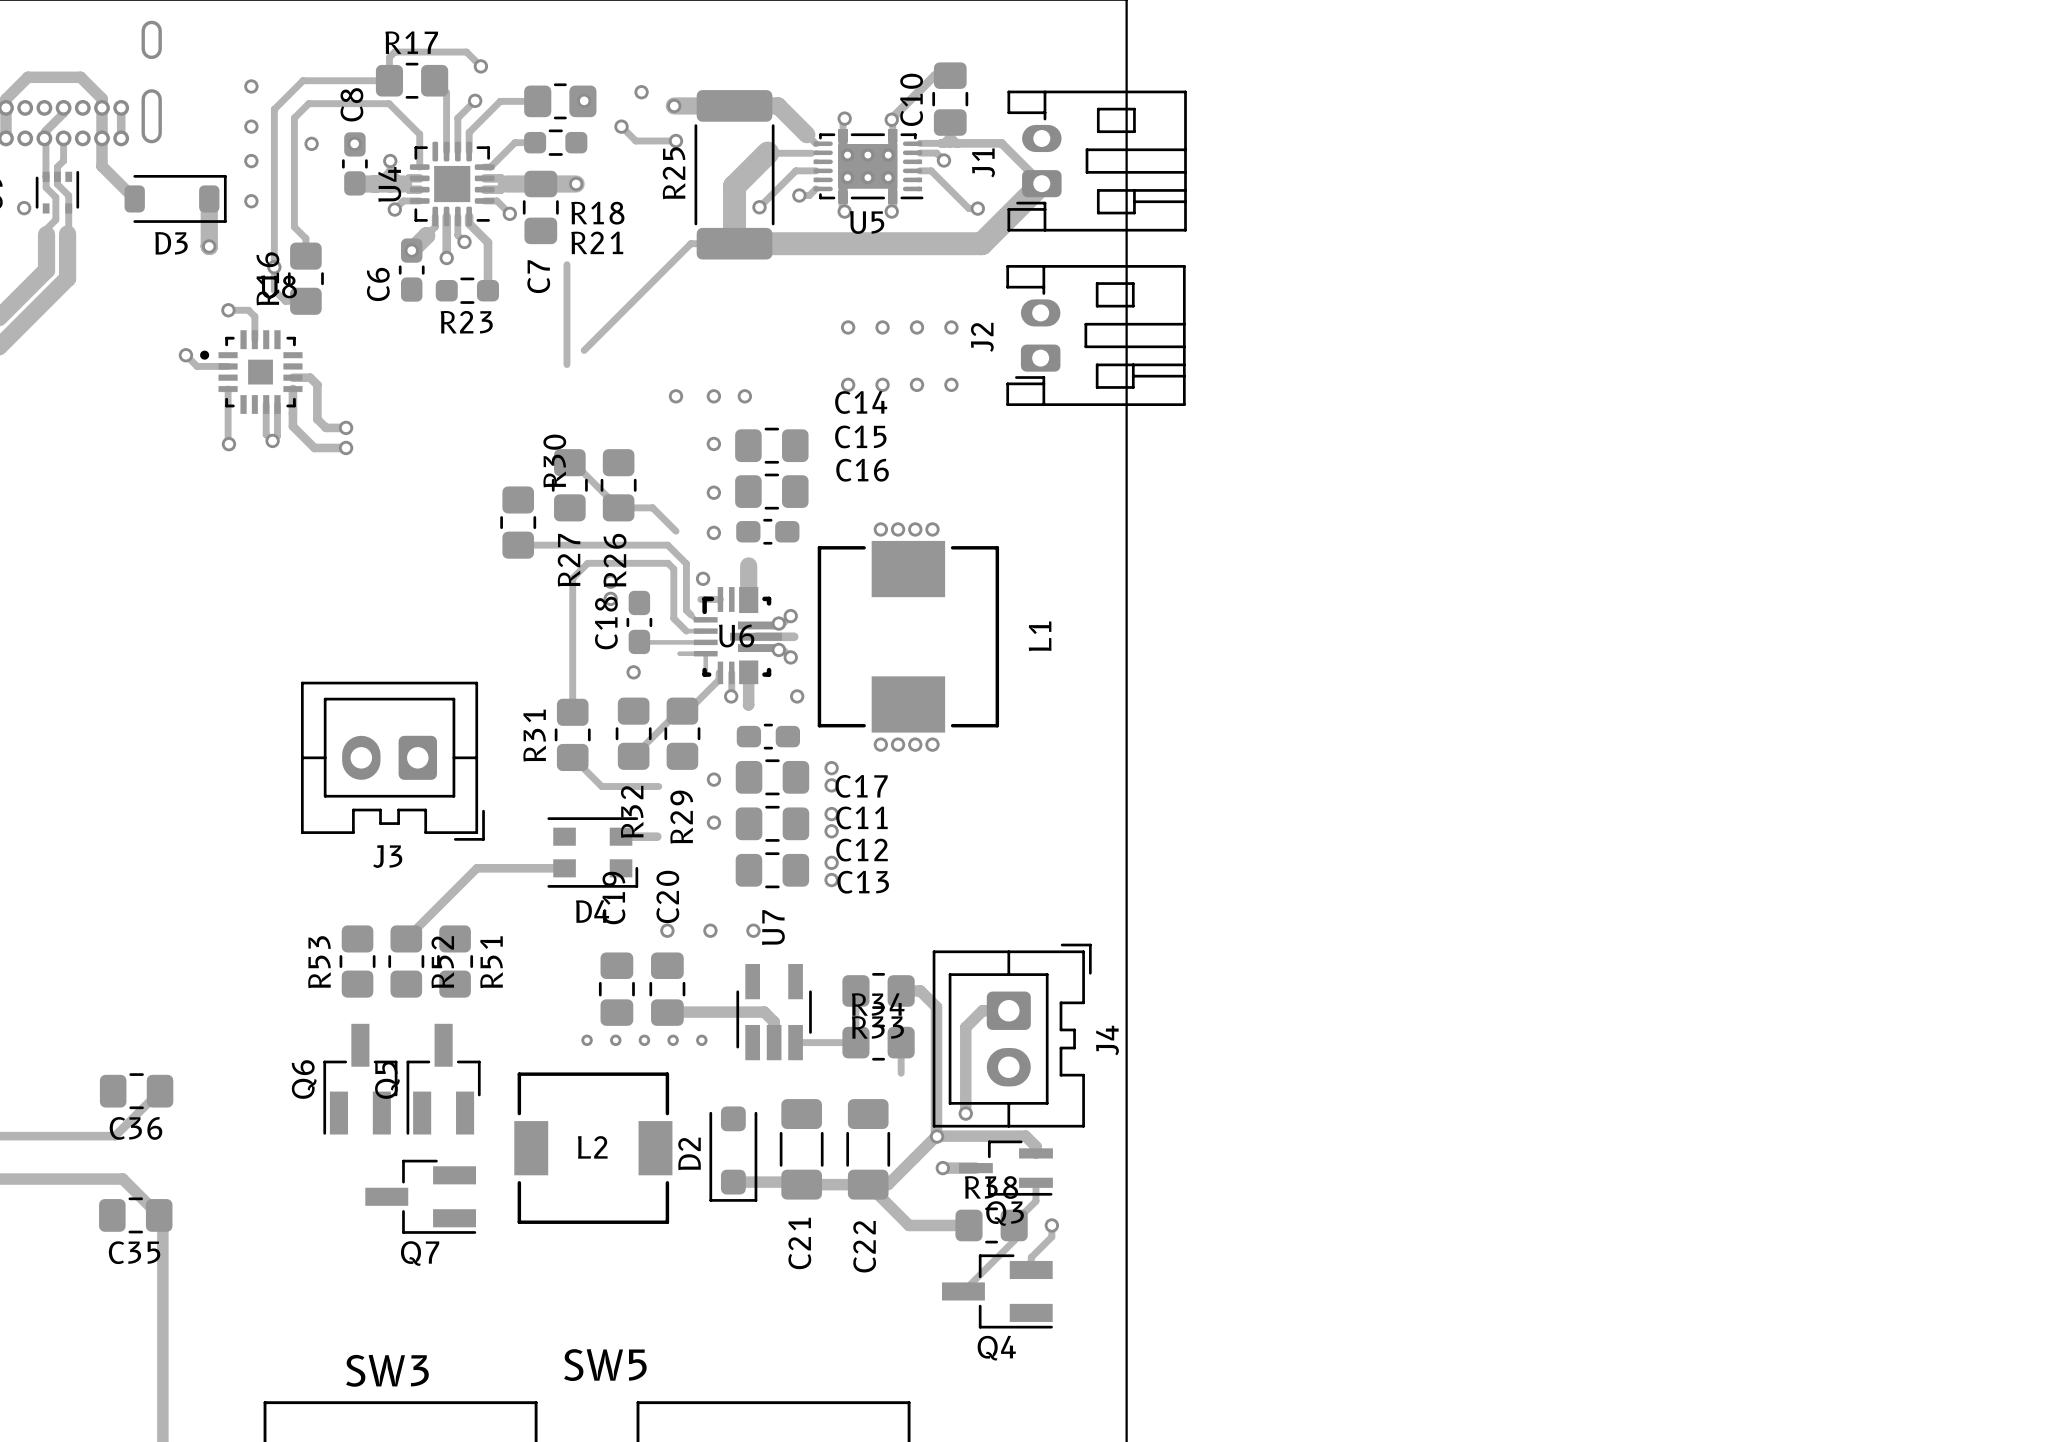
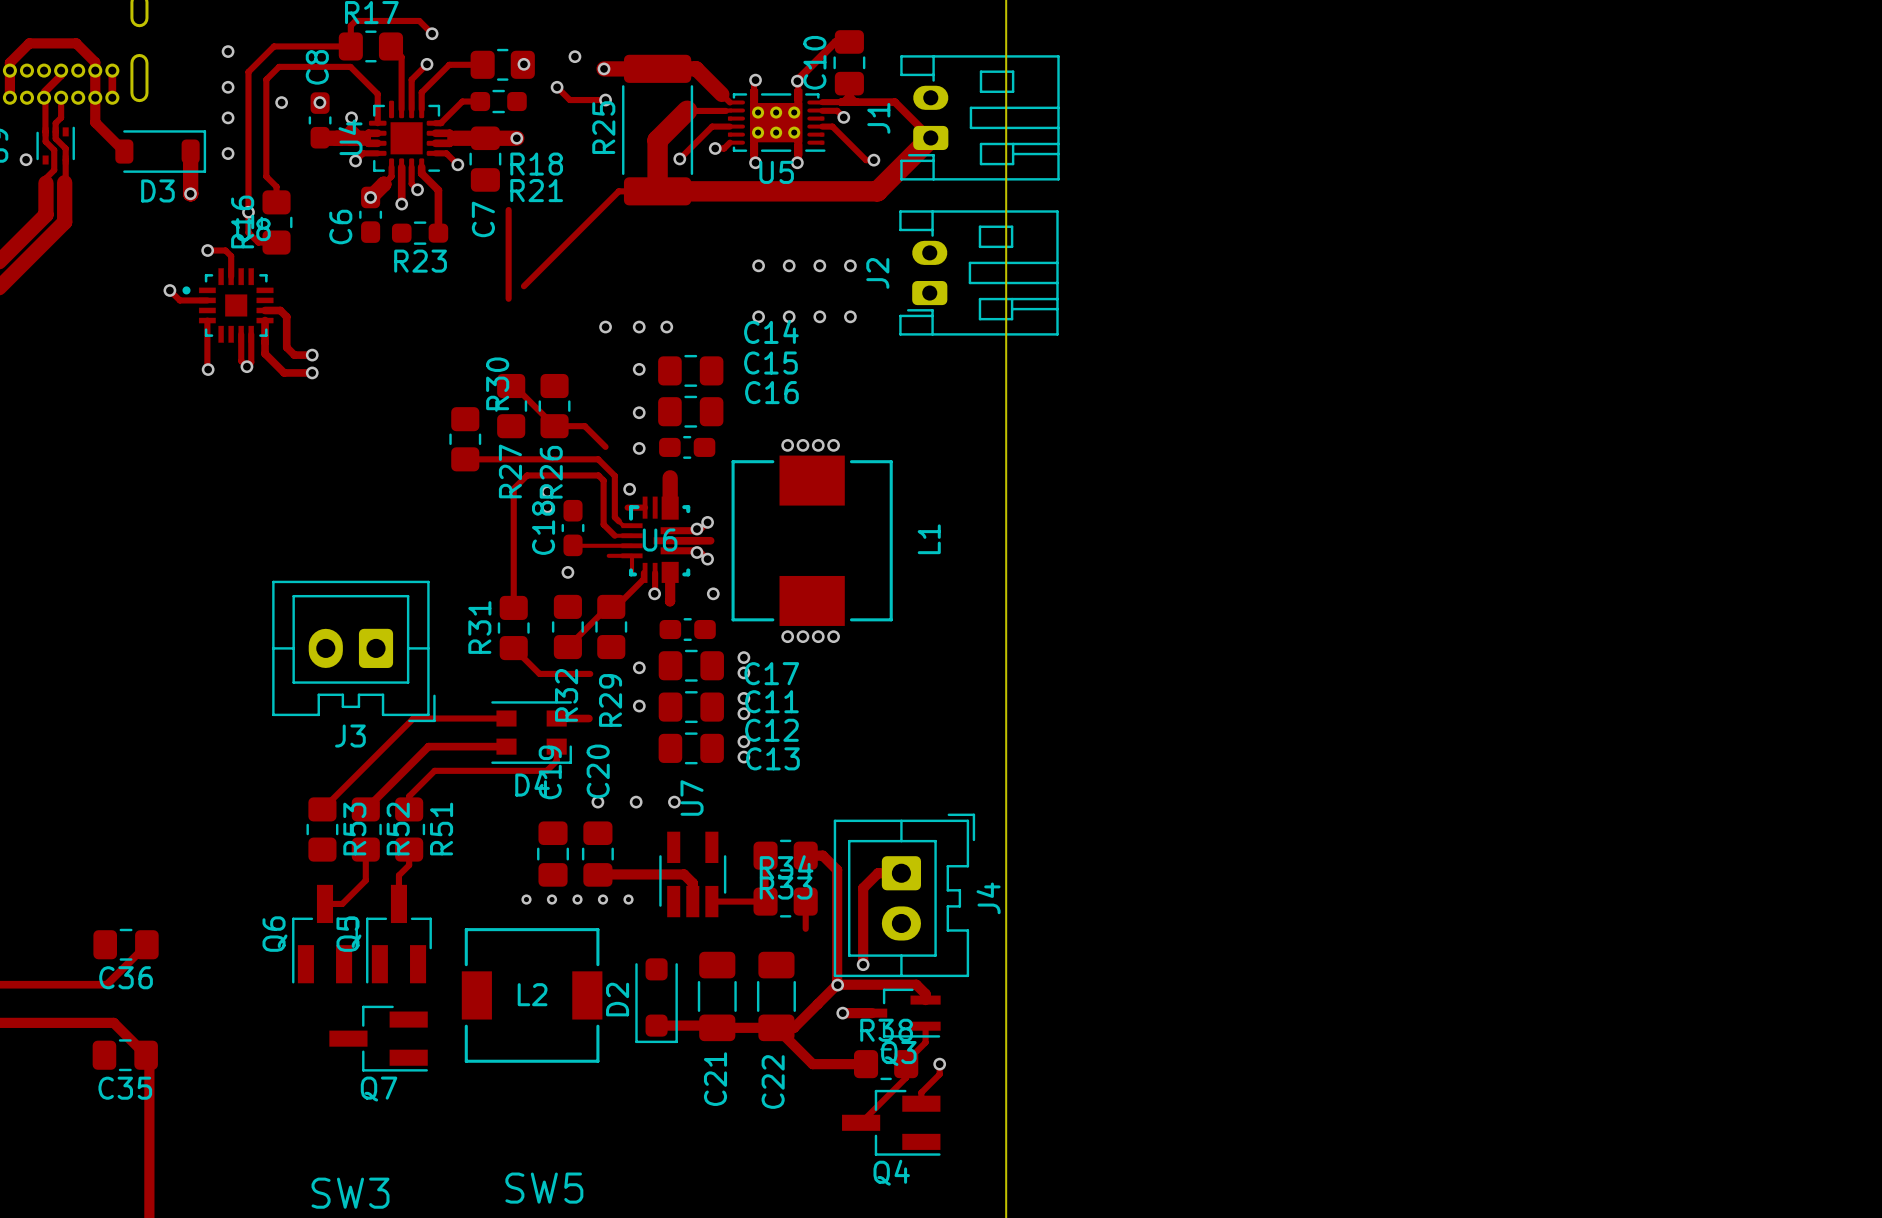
track: none -> (506, 718) (413, 718) (322, 809)
track: none -> (556, 746) (556, 761) (546, 770) (434, 770) (409, 796) (409, 809)
R53 name position: R53 (319, 962) -> R53 (354, 829)
track: none -> (365, 849) (365, 880) (342, 903) (324, 903)
track: none -> (409, 849) (409, 865) (398, 875) (398, 903)

